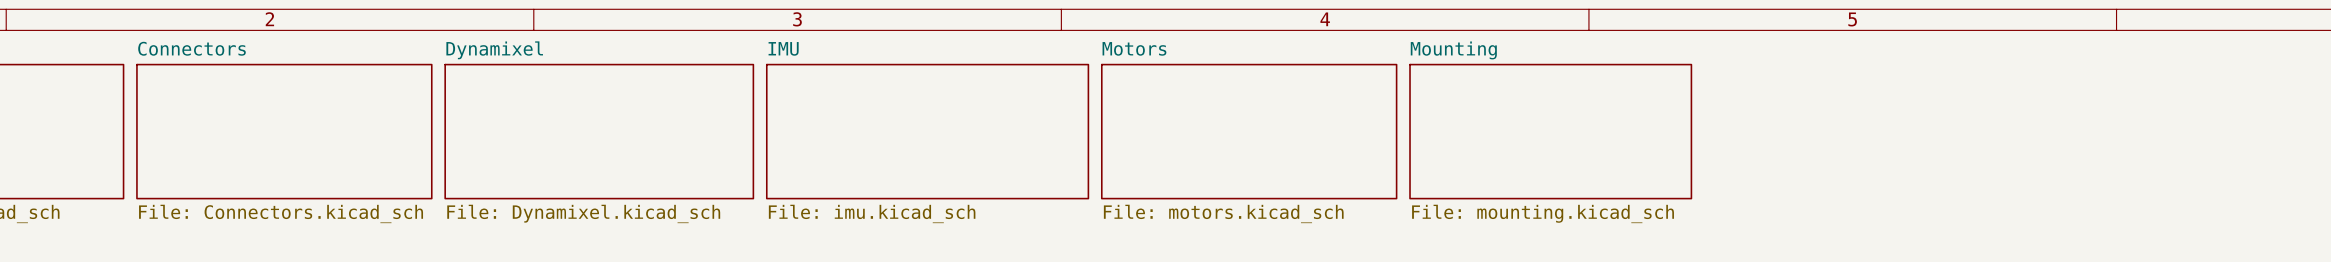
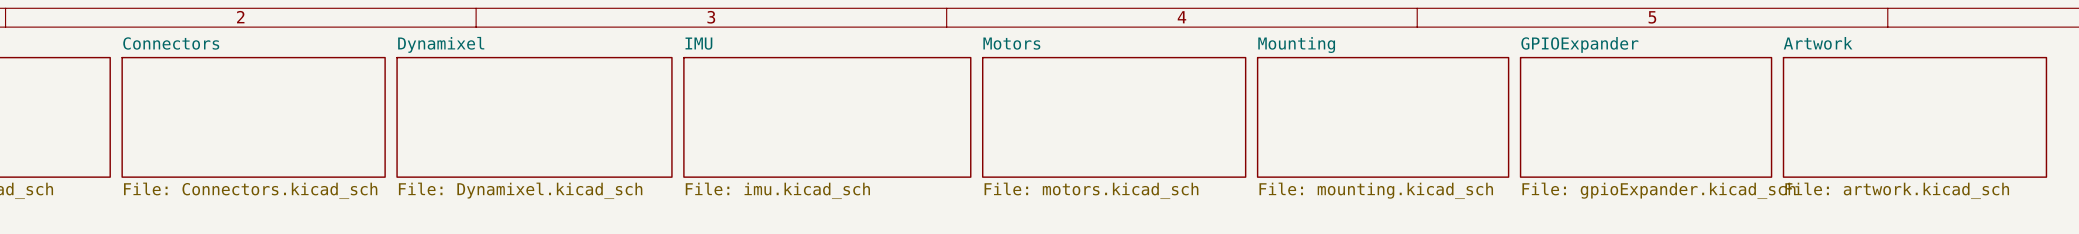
sheet GPIOExpander: none -> File: gpioExpander.kicad_sch (1646, 117)
sheet Artwork: none -> File: artwork.kicad_sch (1914, 117)

